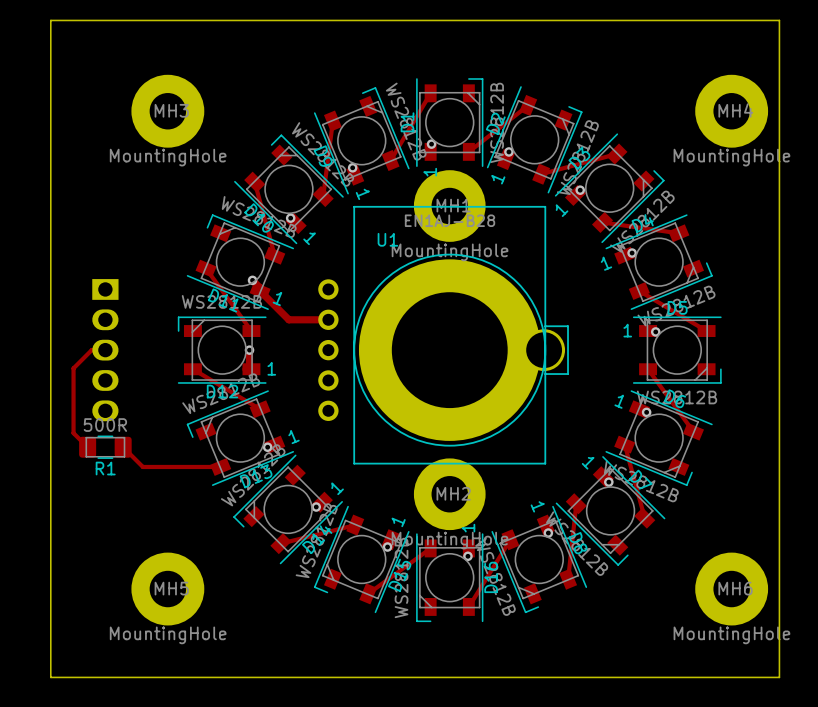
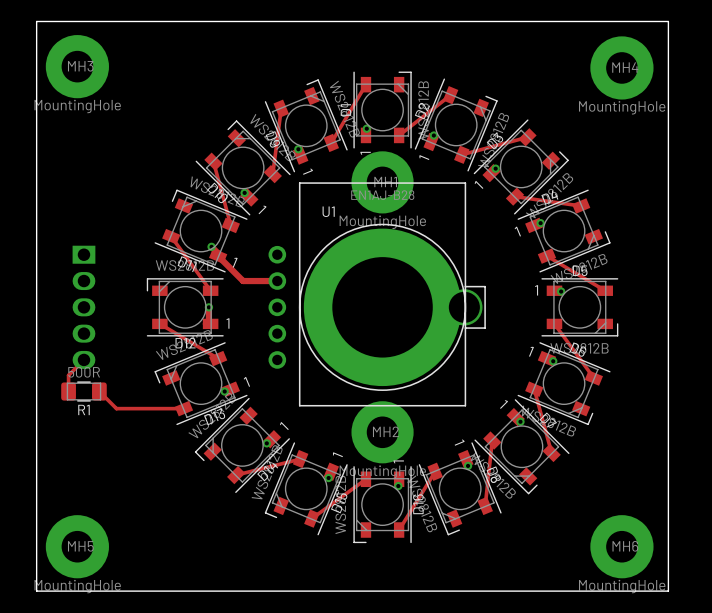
MH3 position: (167, 111) -> (77, 66)
MH4 position: (731, 111) -> (621, 67)
track: (105, 350) (91, 350) (73, 368) (73, 433) (87, 447) -> (83, 359) (68, 375) (68, 391)
MH5 position: (167, 589) -> (77, 546)
MH6 position: (731, 589) -> (621, 546)

